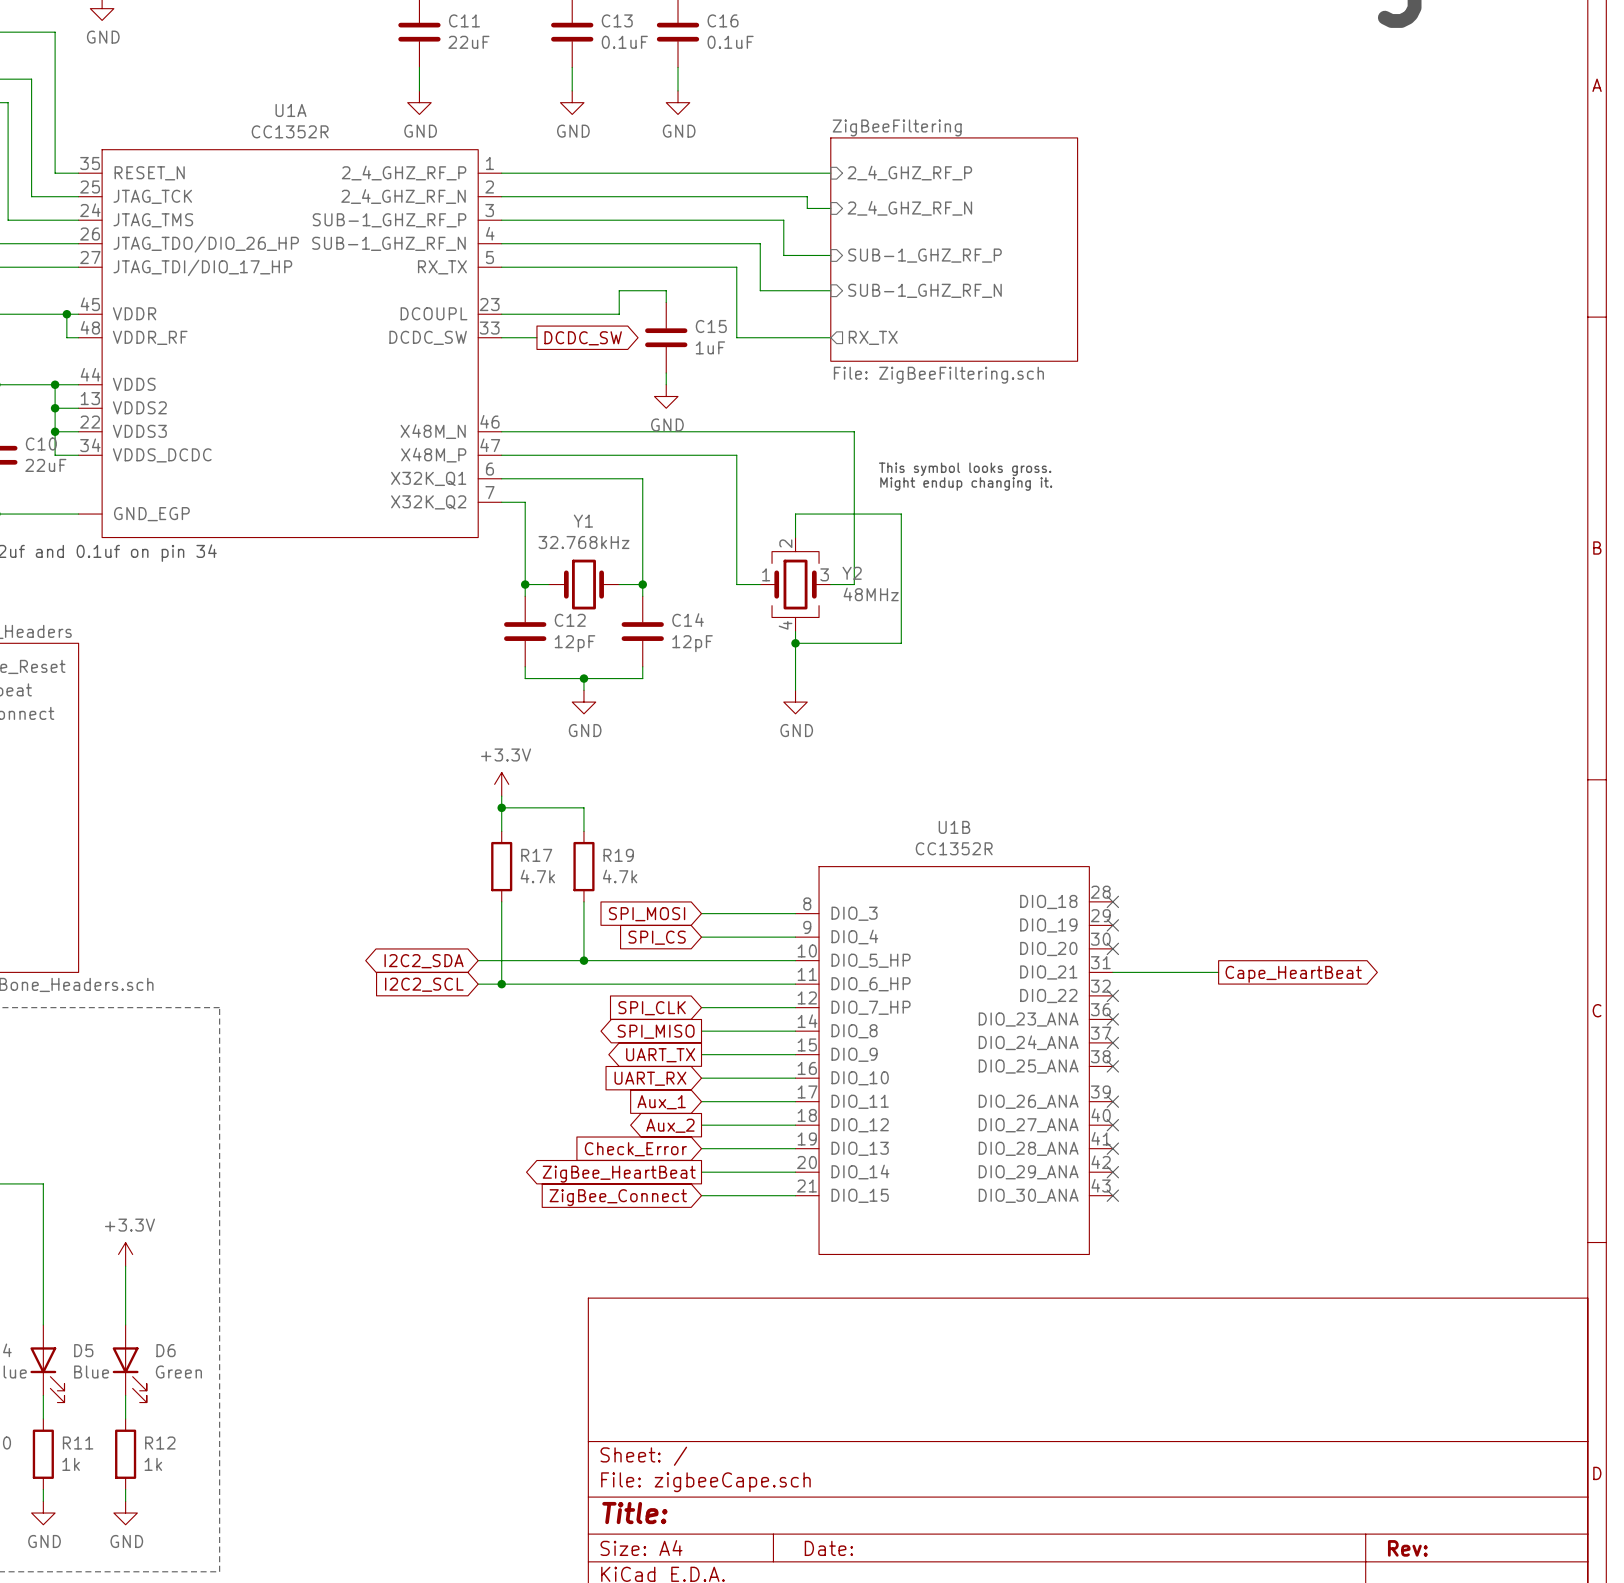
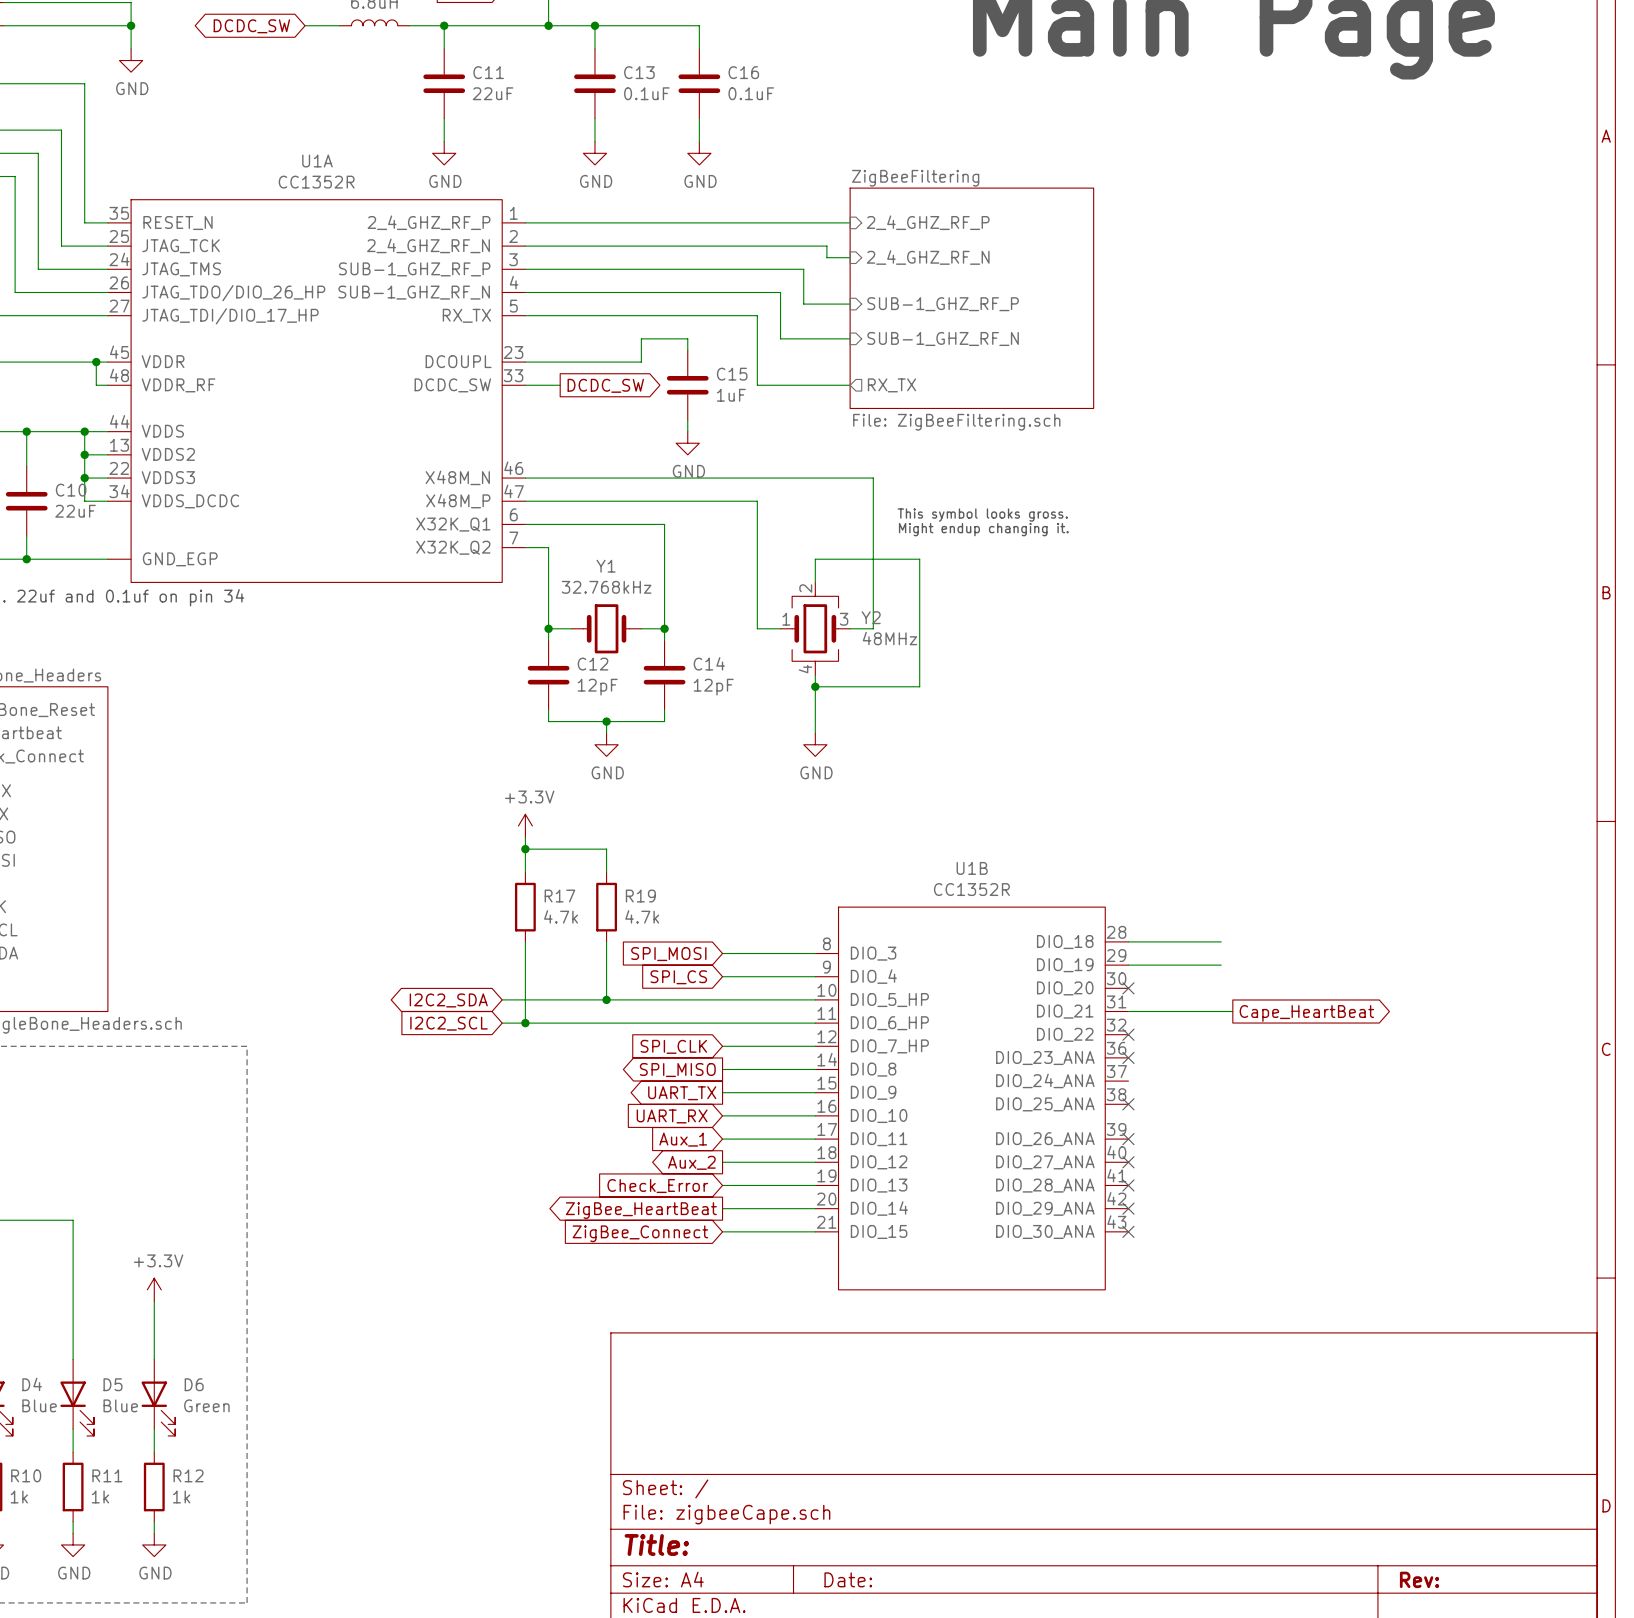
wire: none -> (1128, 941) (1221, 941)
no-connect mark: (1112, 901) -> none
wire: none -> (1128, 965) (1221, 965)
no-connect mark: (1112, 925) -> none
no-connect mark: (1112, 1042) -> none

